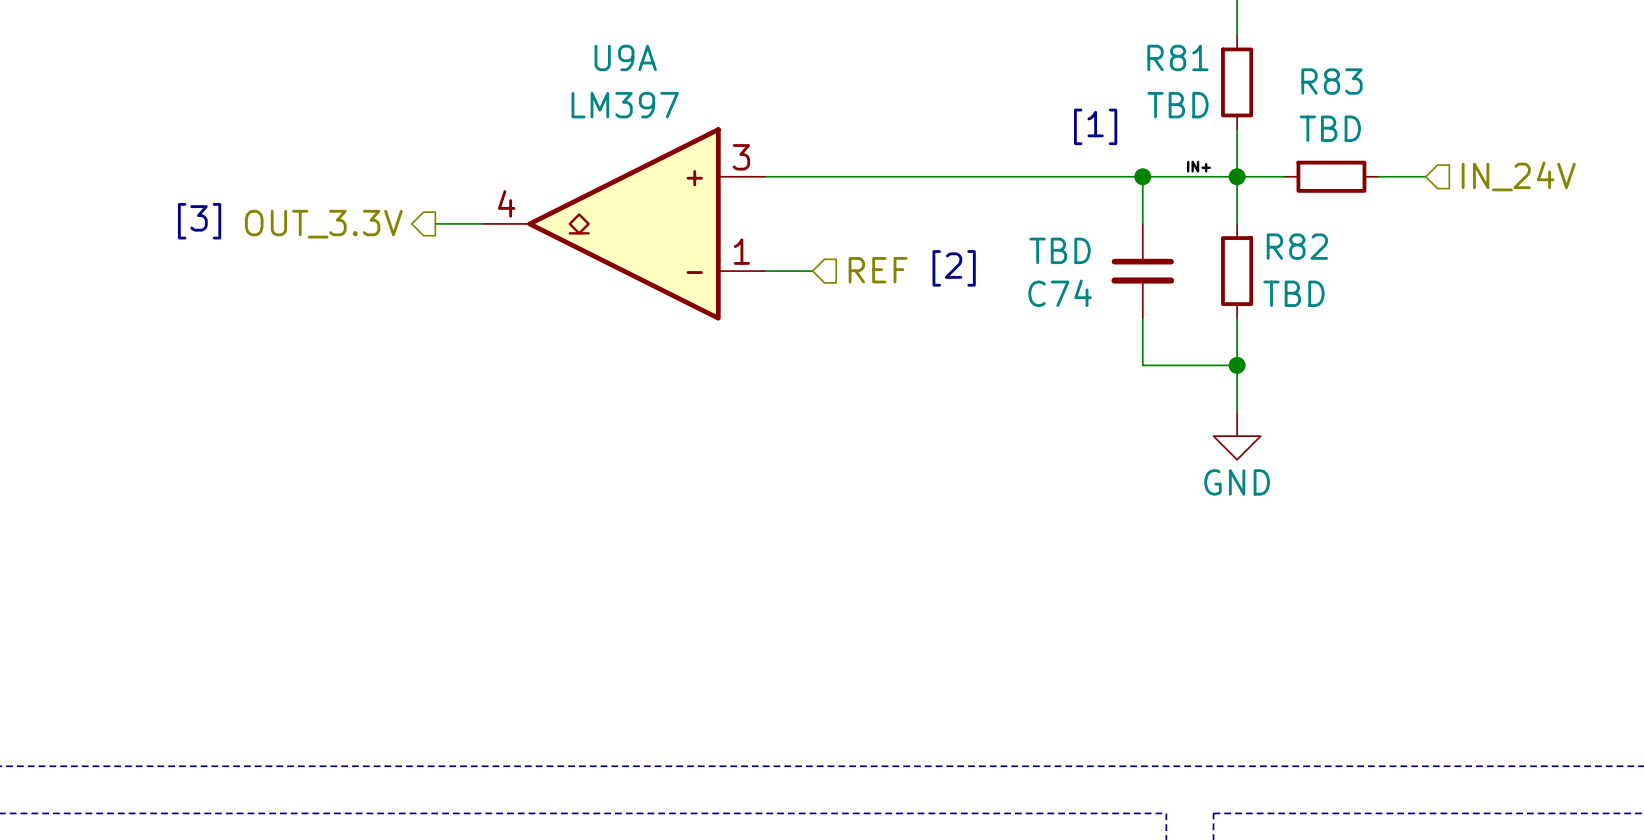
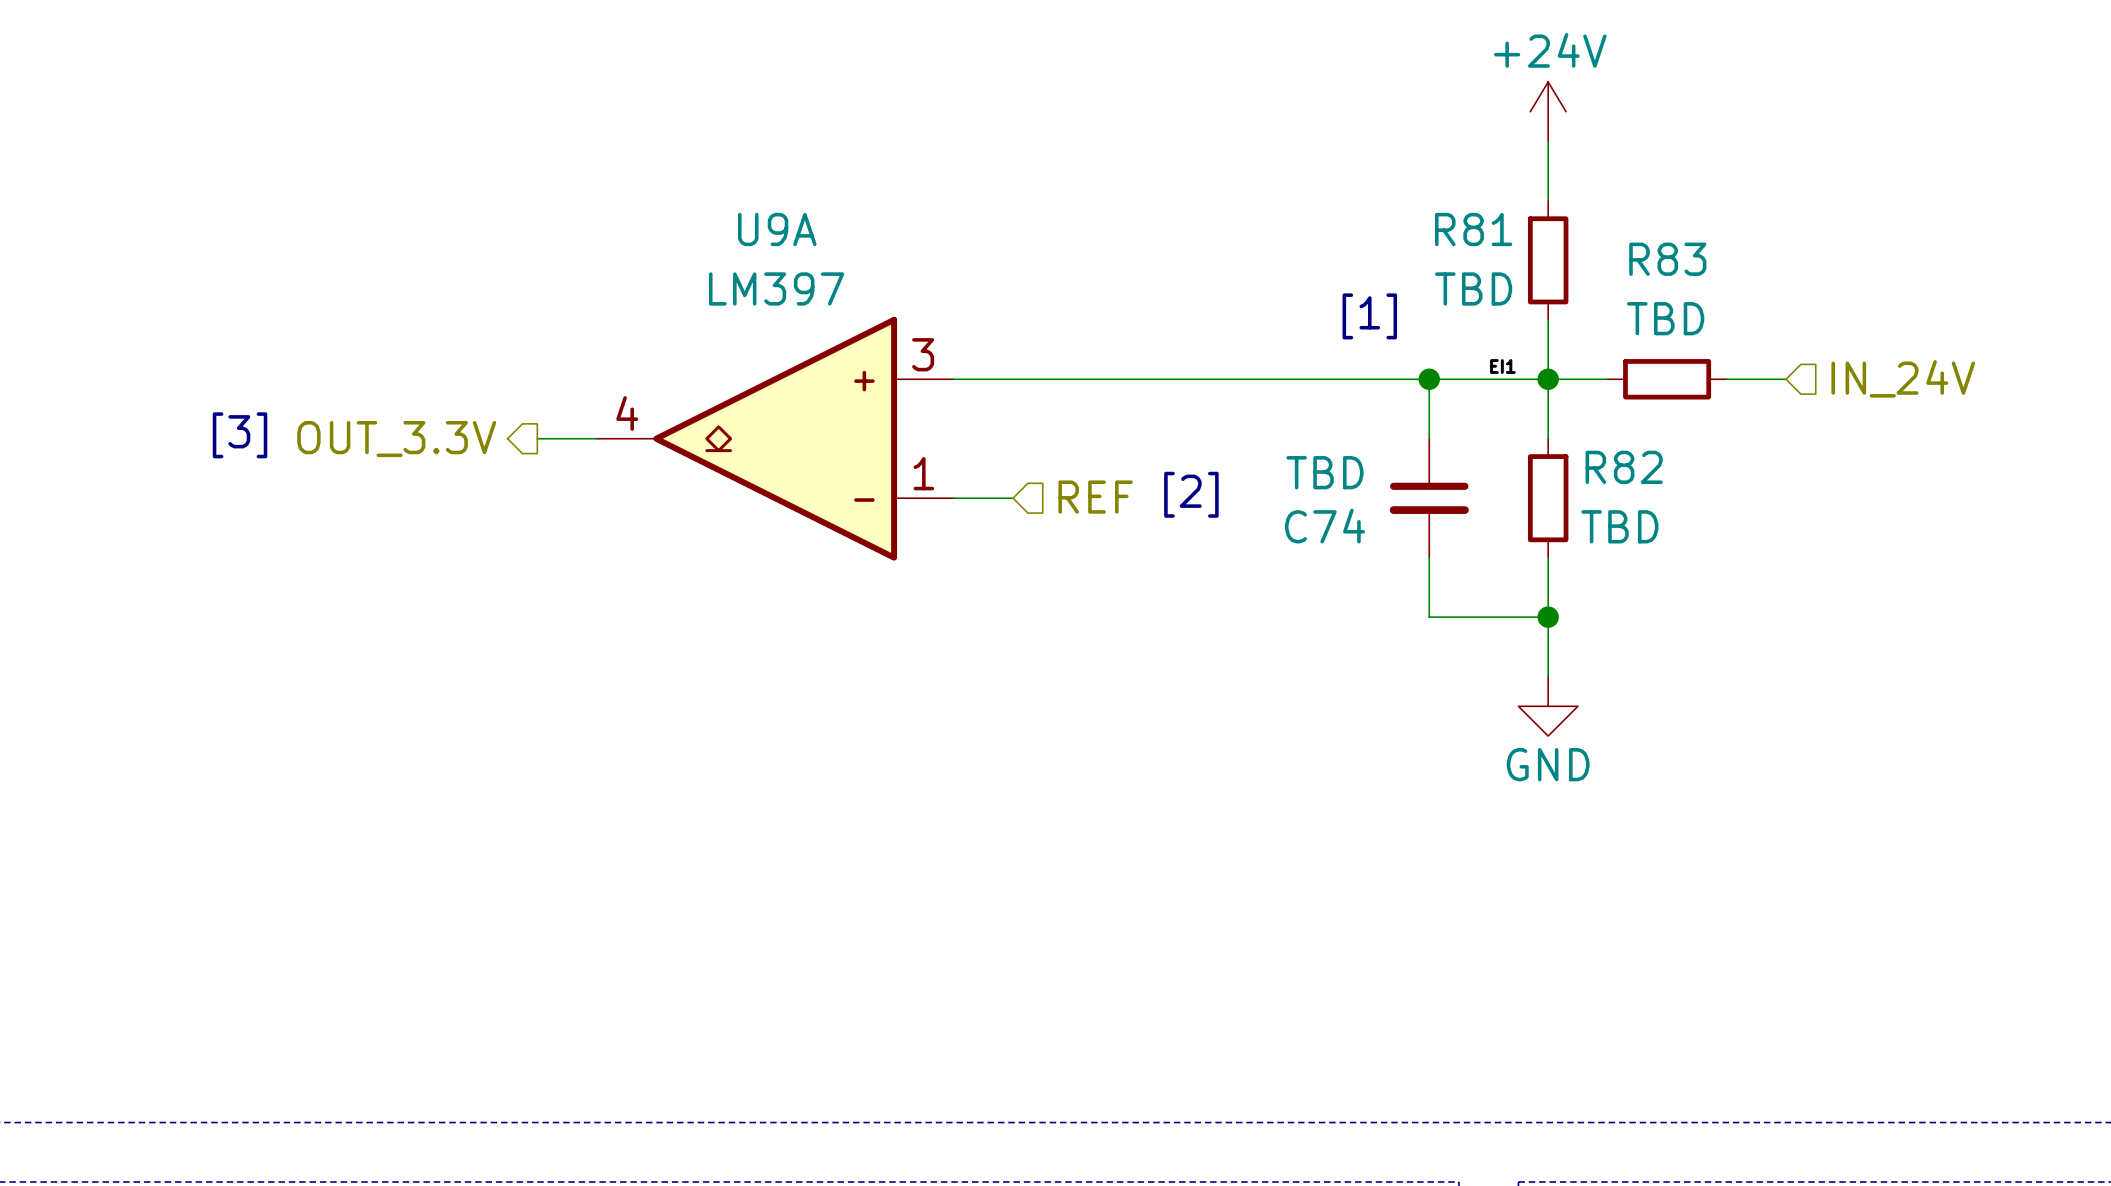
label: IN+ (1198, 166) -> EI1 (1502, 366)

